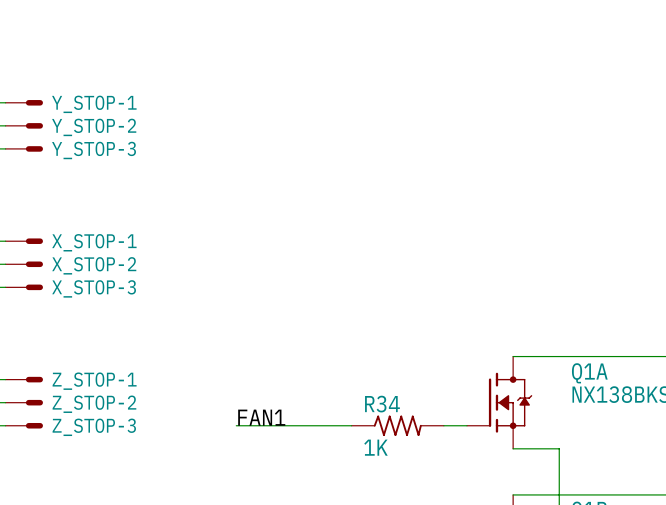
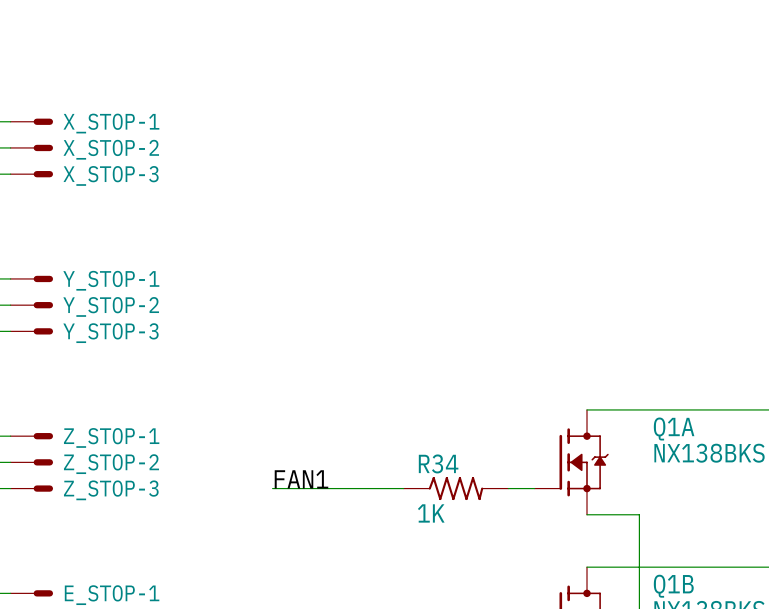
Y_STOP-1 name: Y_STOP-1 (94, 104) -> X_STOP-1 (111, 123)
Y_STOP-2 name: Y_STOP-2 (94, 127) -> X_STOP-2 (111, 149)
Y_STOP-3 name: Y_STOP-3 (94, 150) -> X_STOP-3 (111, 175)
X_STOP-1 name: X_STOP-1 (94, 242) -> Y_STOP-1 (111, 280)
X_STOP-2 name: X_STOP-2 (94, 265) -> Y_STOP-2 (111, 306)
X_STOP-3 name: X_STOP-3 (94, 288) -> Y_STOP-3 (110, 333)

